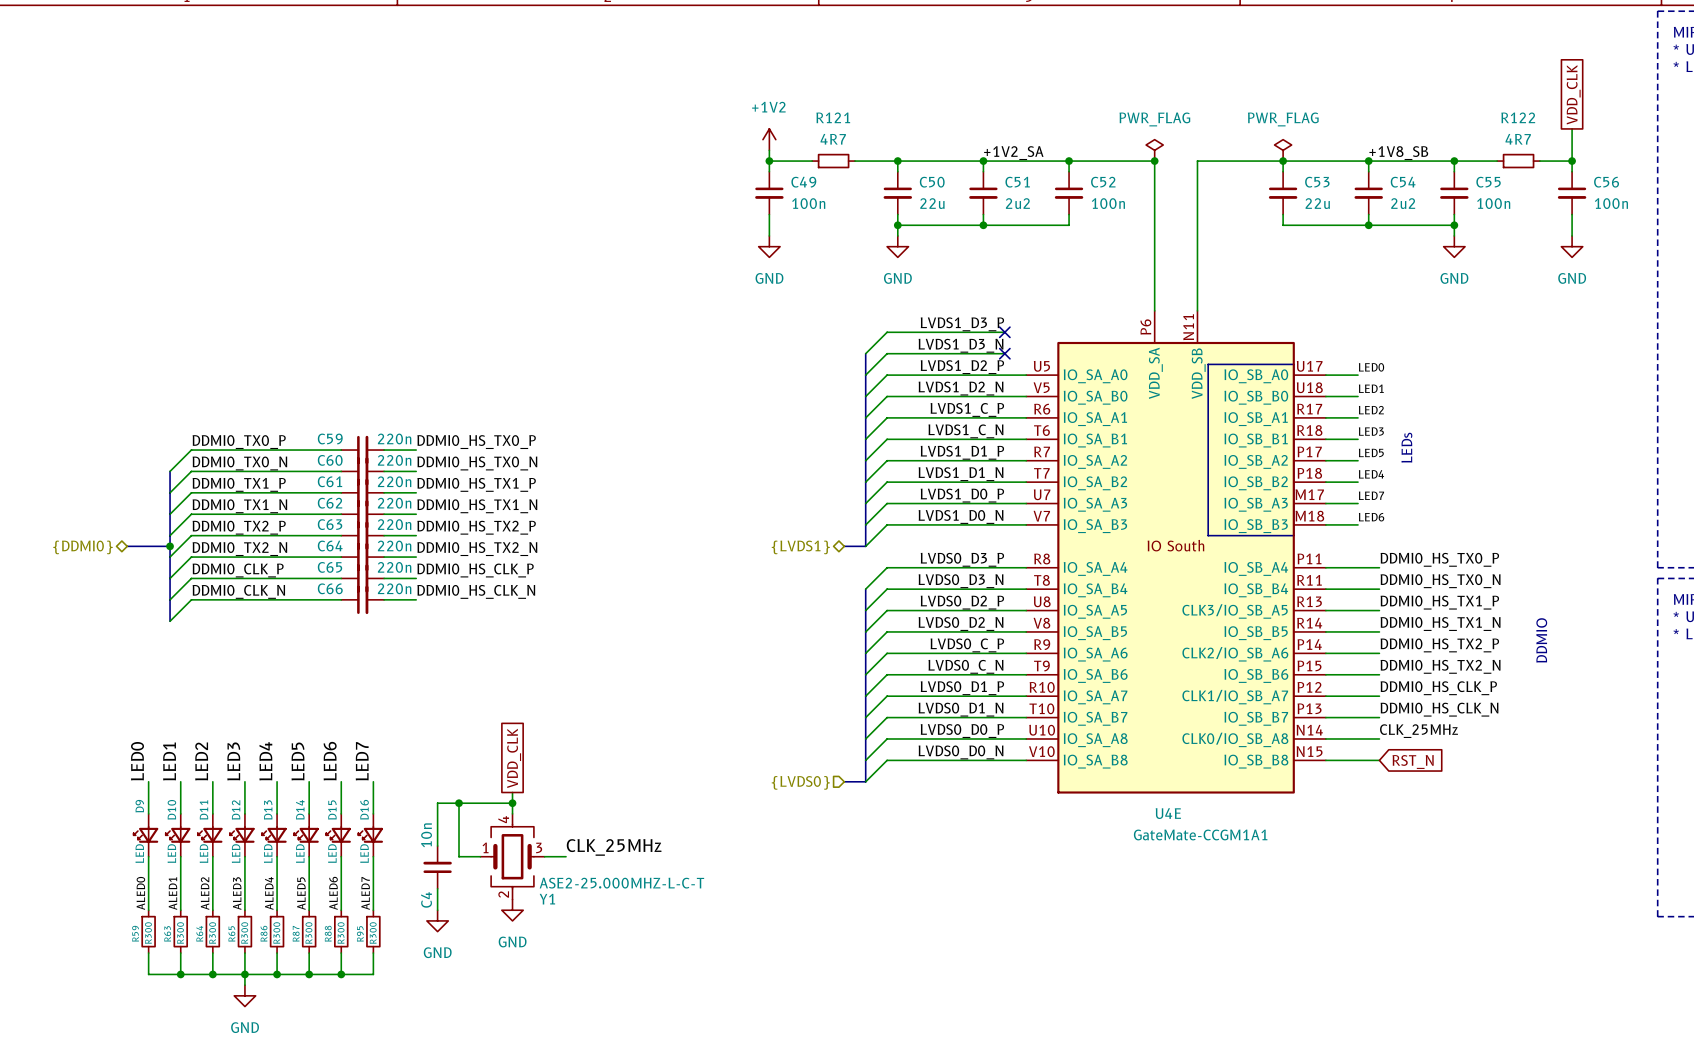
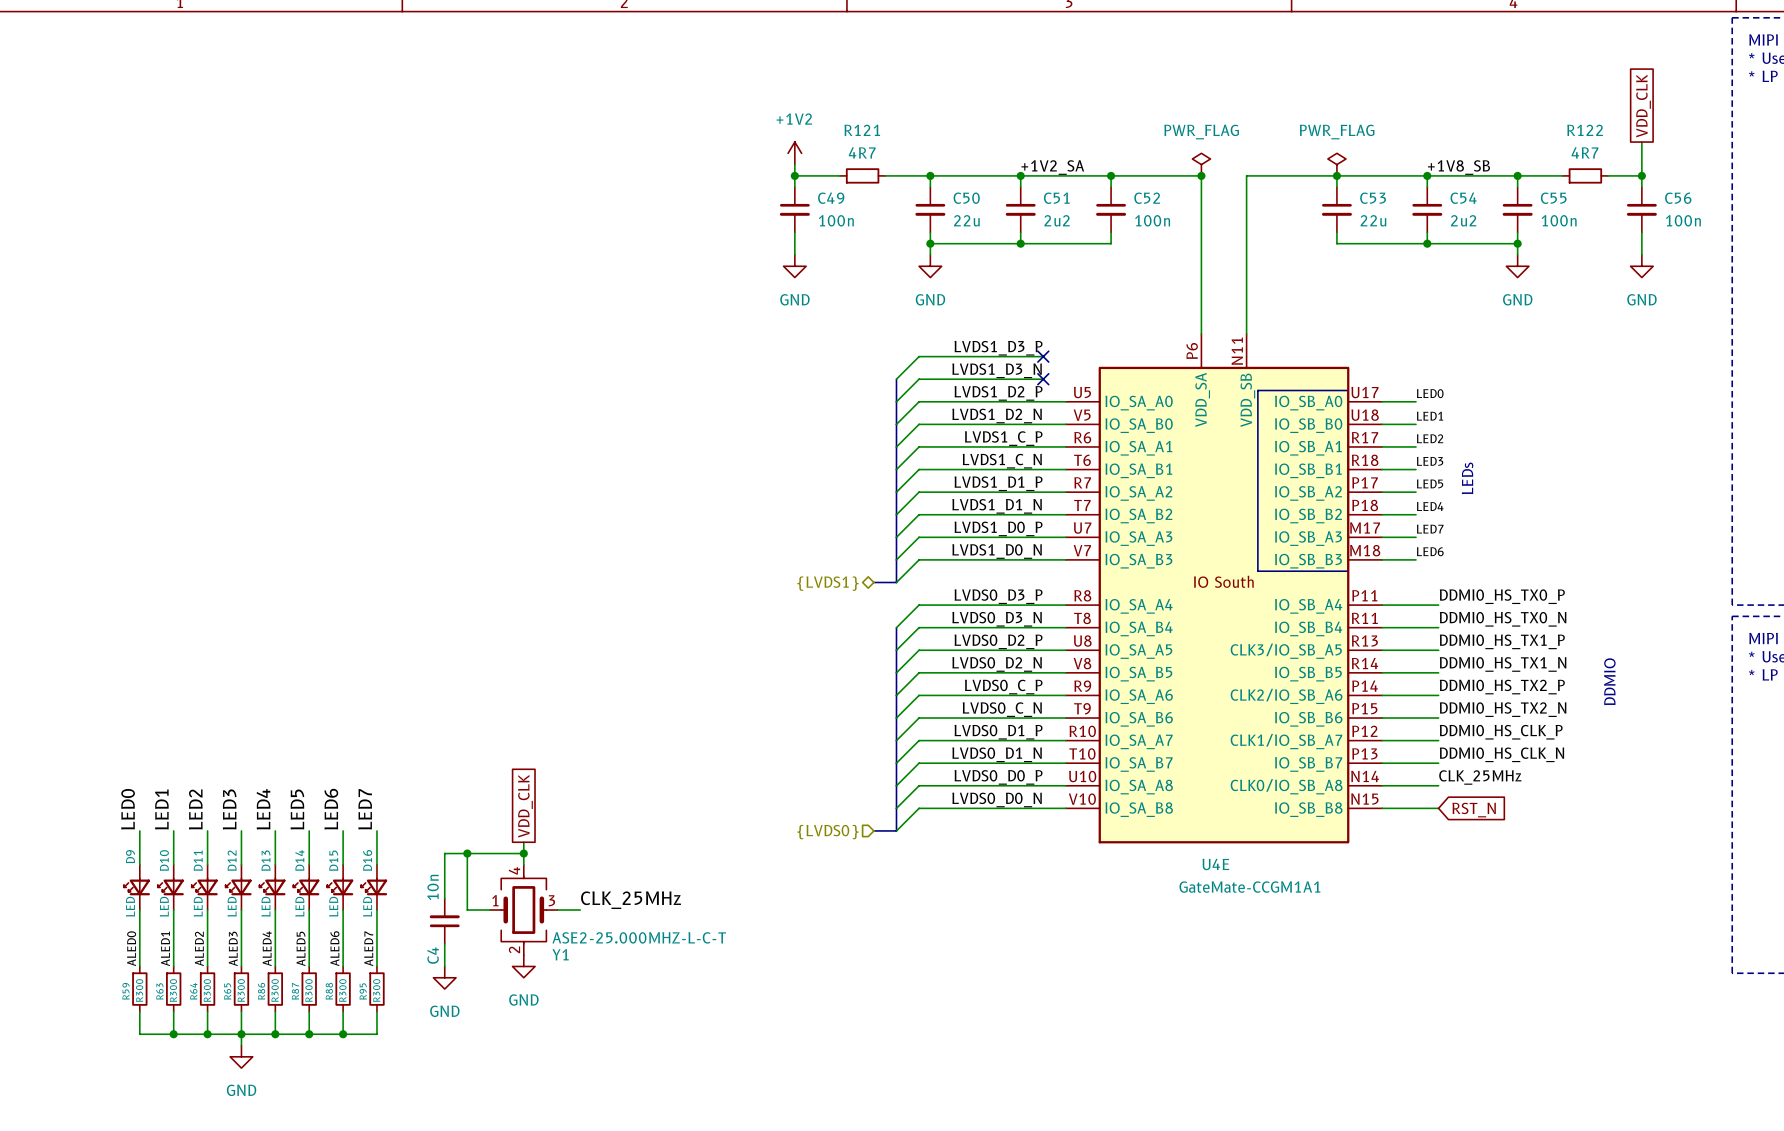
label: DDMI0_TX0_P (239, 442) -> none
label: DDMI0_HS_TX0_P (476, 442) -> none
wire: (341, 450) (191, 450) (170, 471) -> none
C59: 220n (362, 450) -> none
wire: (384, 450) (416, 450) -> none
label: DDMI0_TX0_N (239, 463) -> none
label: DDMI0_HS_TX0_N (477, 463) -> none
bus: (170, 471) (170, 621) -> none
wire: (341, 471) (191, 471) (170, 492) -> none
C60: 220n (362, 471) -> none
wire: (384, 471) (416, 471) -> none
label: DDMI0_TX1_P (239, 484) -> none
label: DDMI0_HS_TX1_P (476, 484) -> none
wire: (341, 492) (191, 492) (170, 514) -> none
C61: 220n (362, 492) -> none
wire: (384, 492) (416, 492) -> none
label: DDMI0_TX1_N (239, 506) -> none
label: DDMI0_HS_TX1_N (477, 506) -> none
wire: (341, 514) (191, 514) (170, 535) -> none
C62: 220n (362, 514) -> none
wire: (384, 514) (416, 514) -> none
label: DDMI0_TX2_P (239, 527) -> none
label: DDMI0_HS_TX2_P (476, 527) -> none
wire: (341, 535) (191, 535) (170, 557) -> none
C63: 220n (362, 535) -> none
wire: (384, 535) (416, 535) -> none
bus: (127, 546) (170, 546) -> none
junction: (170, 546) -> none
hierarchical label: {DDMI0} (83, 547) -> none
label: DDMI0_TX2_N (239, 549) -> none
label: DDMI0_HS_TX2_N (477, 549) -> none
wire: (341, 557) (191, 557) (170, 578) -> none
C64: 220n (362, 557) -> none
wire: (384, 557) (416, 557) -> none
label: DDMI0_CLK_P (238, 570) -> none
label: DDMI0_HS_CLK_P (475, 570) -> none
wire: (341, 578) (191, 578) (170, 599) -> none
C65: 220n (362, 578) -> none
wire: (384, 578) (416, 578) -> none
label: DDMI0_CLK_N (238, 591) -> none
label: DDMI0_HS_CLK_N (476, 591) -> none
wire: (341, 599) (191, 599) (170, 621) -> none
C66: 220n (362, 599) -> none
wire: (384, 599) (416, 599) -> none

